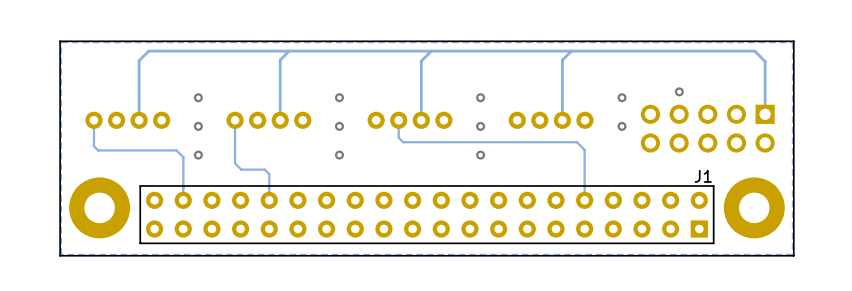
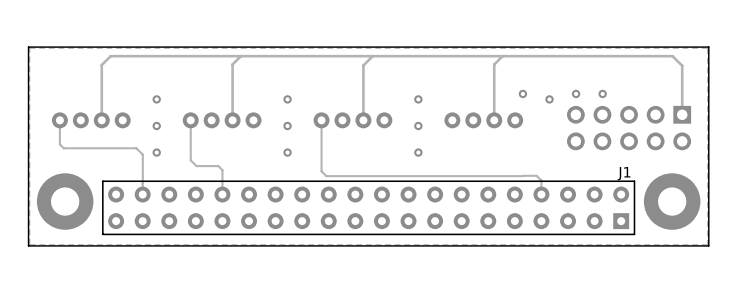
via: none -> (522, 93)
via: none -> (576, 93)
track: none -> (321, 120) (321, 171) (326, 176) (536, 175) (541, 180) (541, 194)
track: (398, 120) (398, 137) (403, 142) (576, 142) (584, 149) (584, 200) -> none
via: (622, 126) -> none

